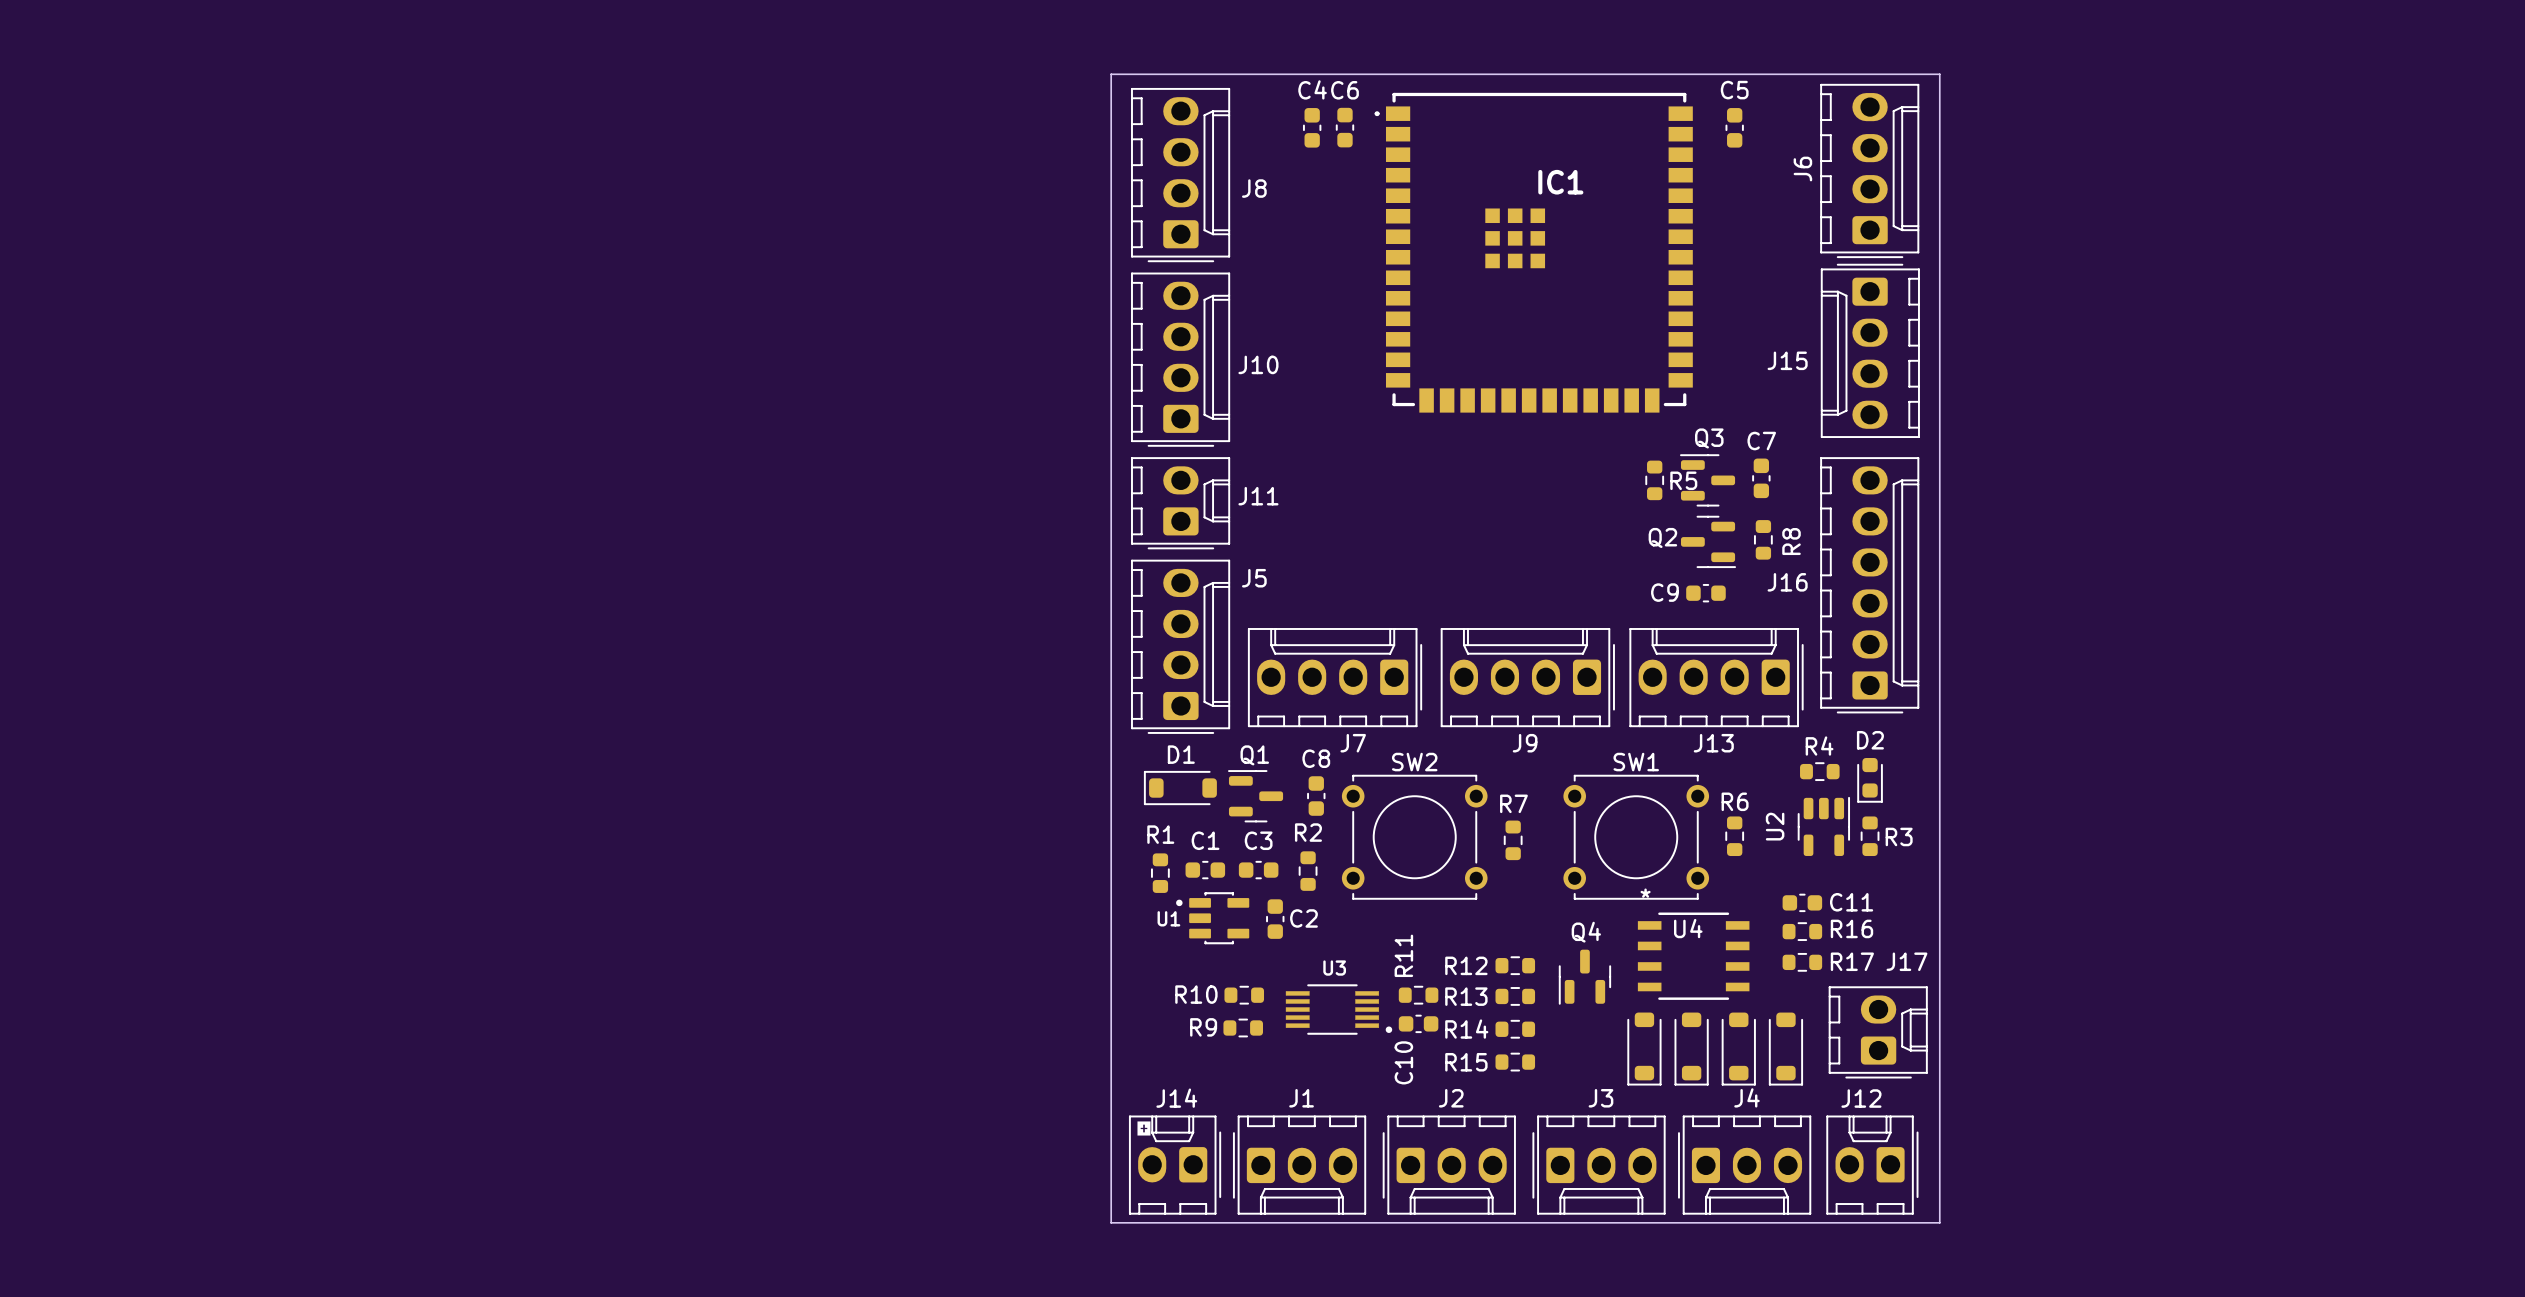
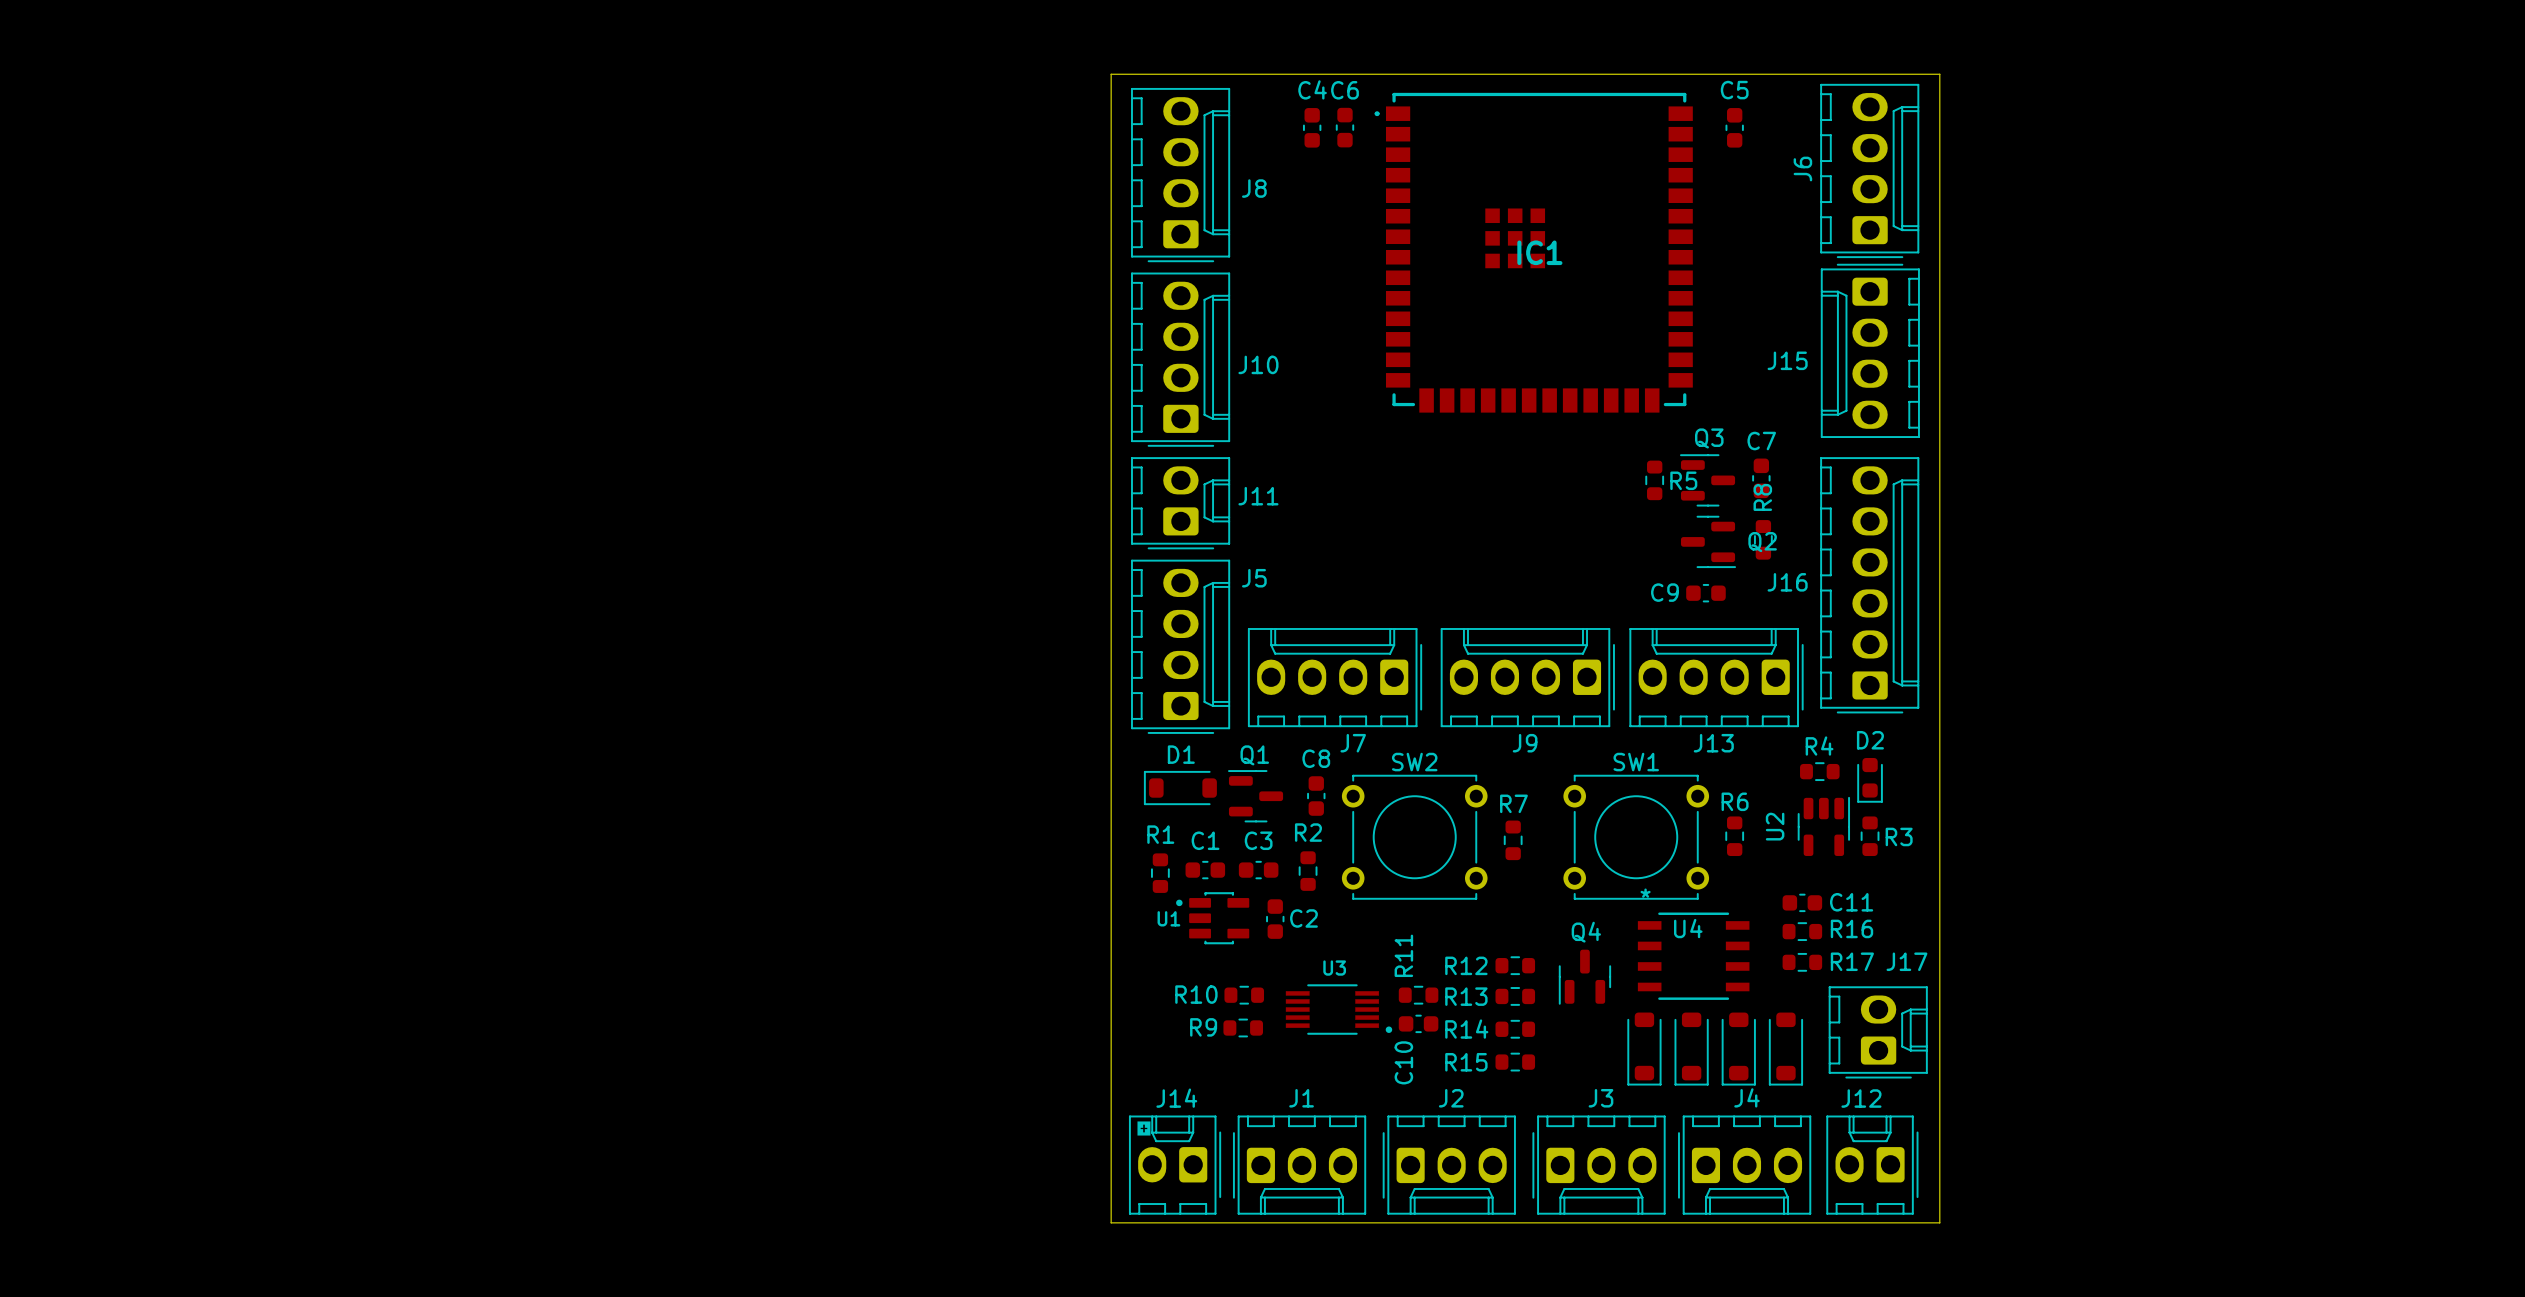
IC1 name position: IC1 (1560, 182) -> IC1 (1539, 252)
Q2 name position: Q2 (1662, 537) -> Q2 (1762, 542)
R8 name position: R8 (1791, 541) -> R8 (1762, 497)

